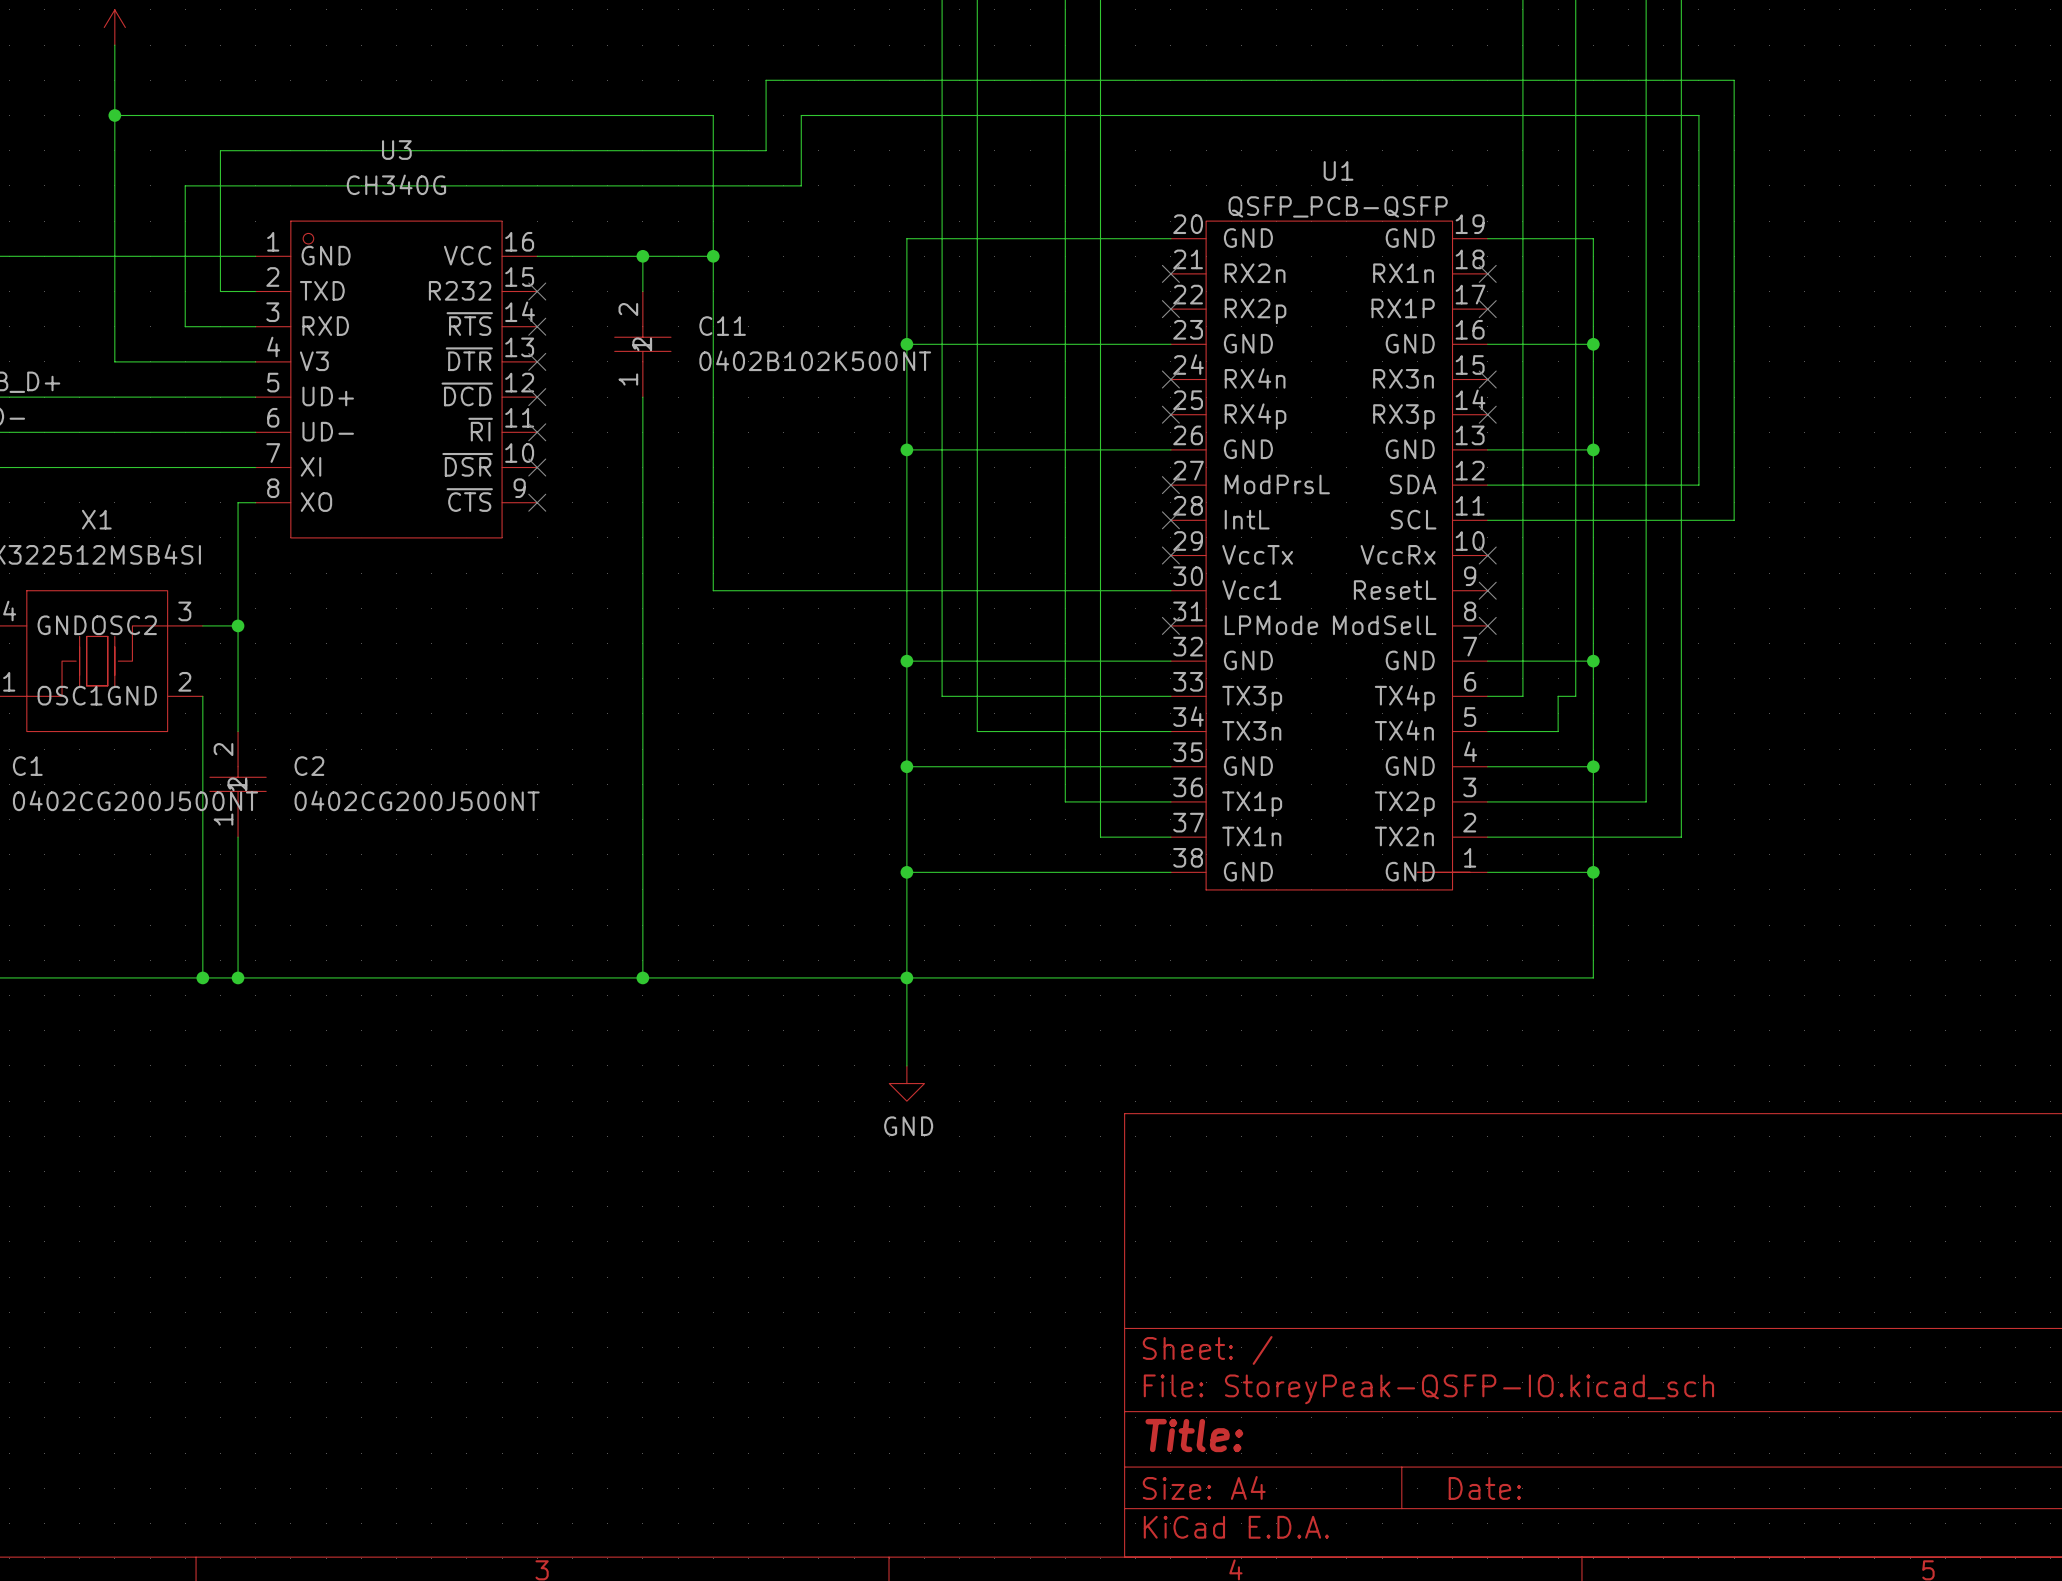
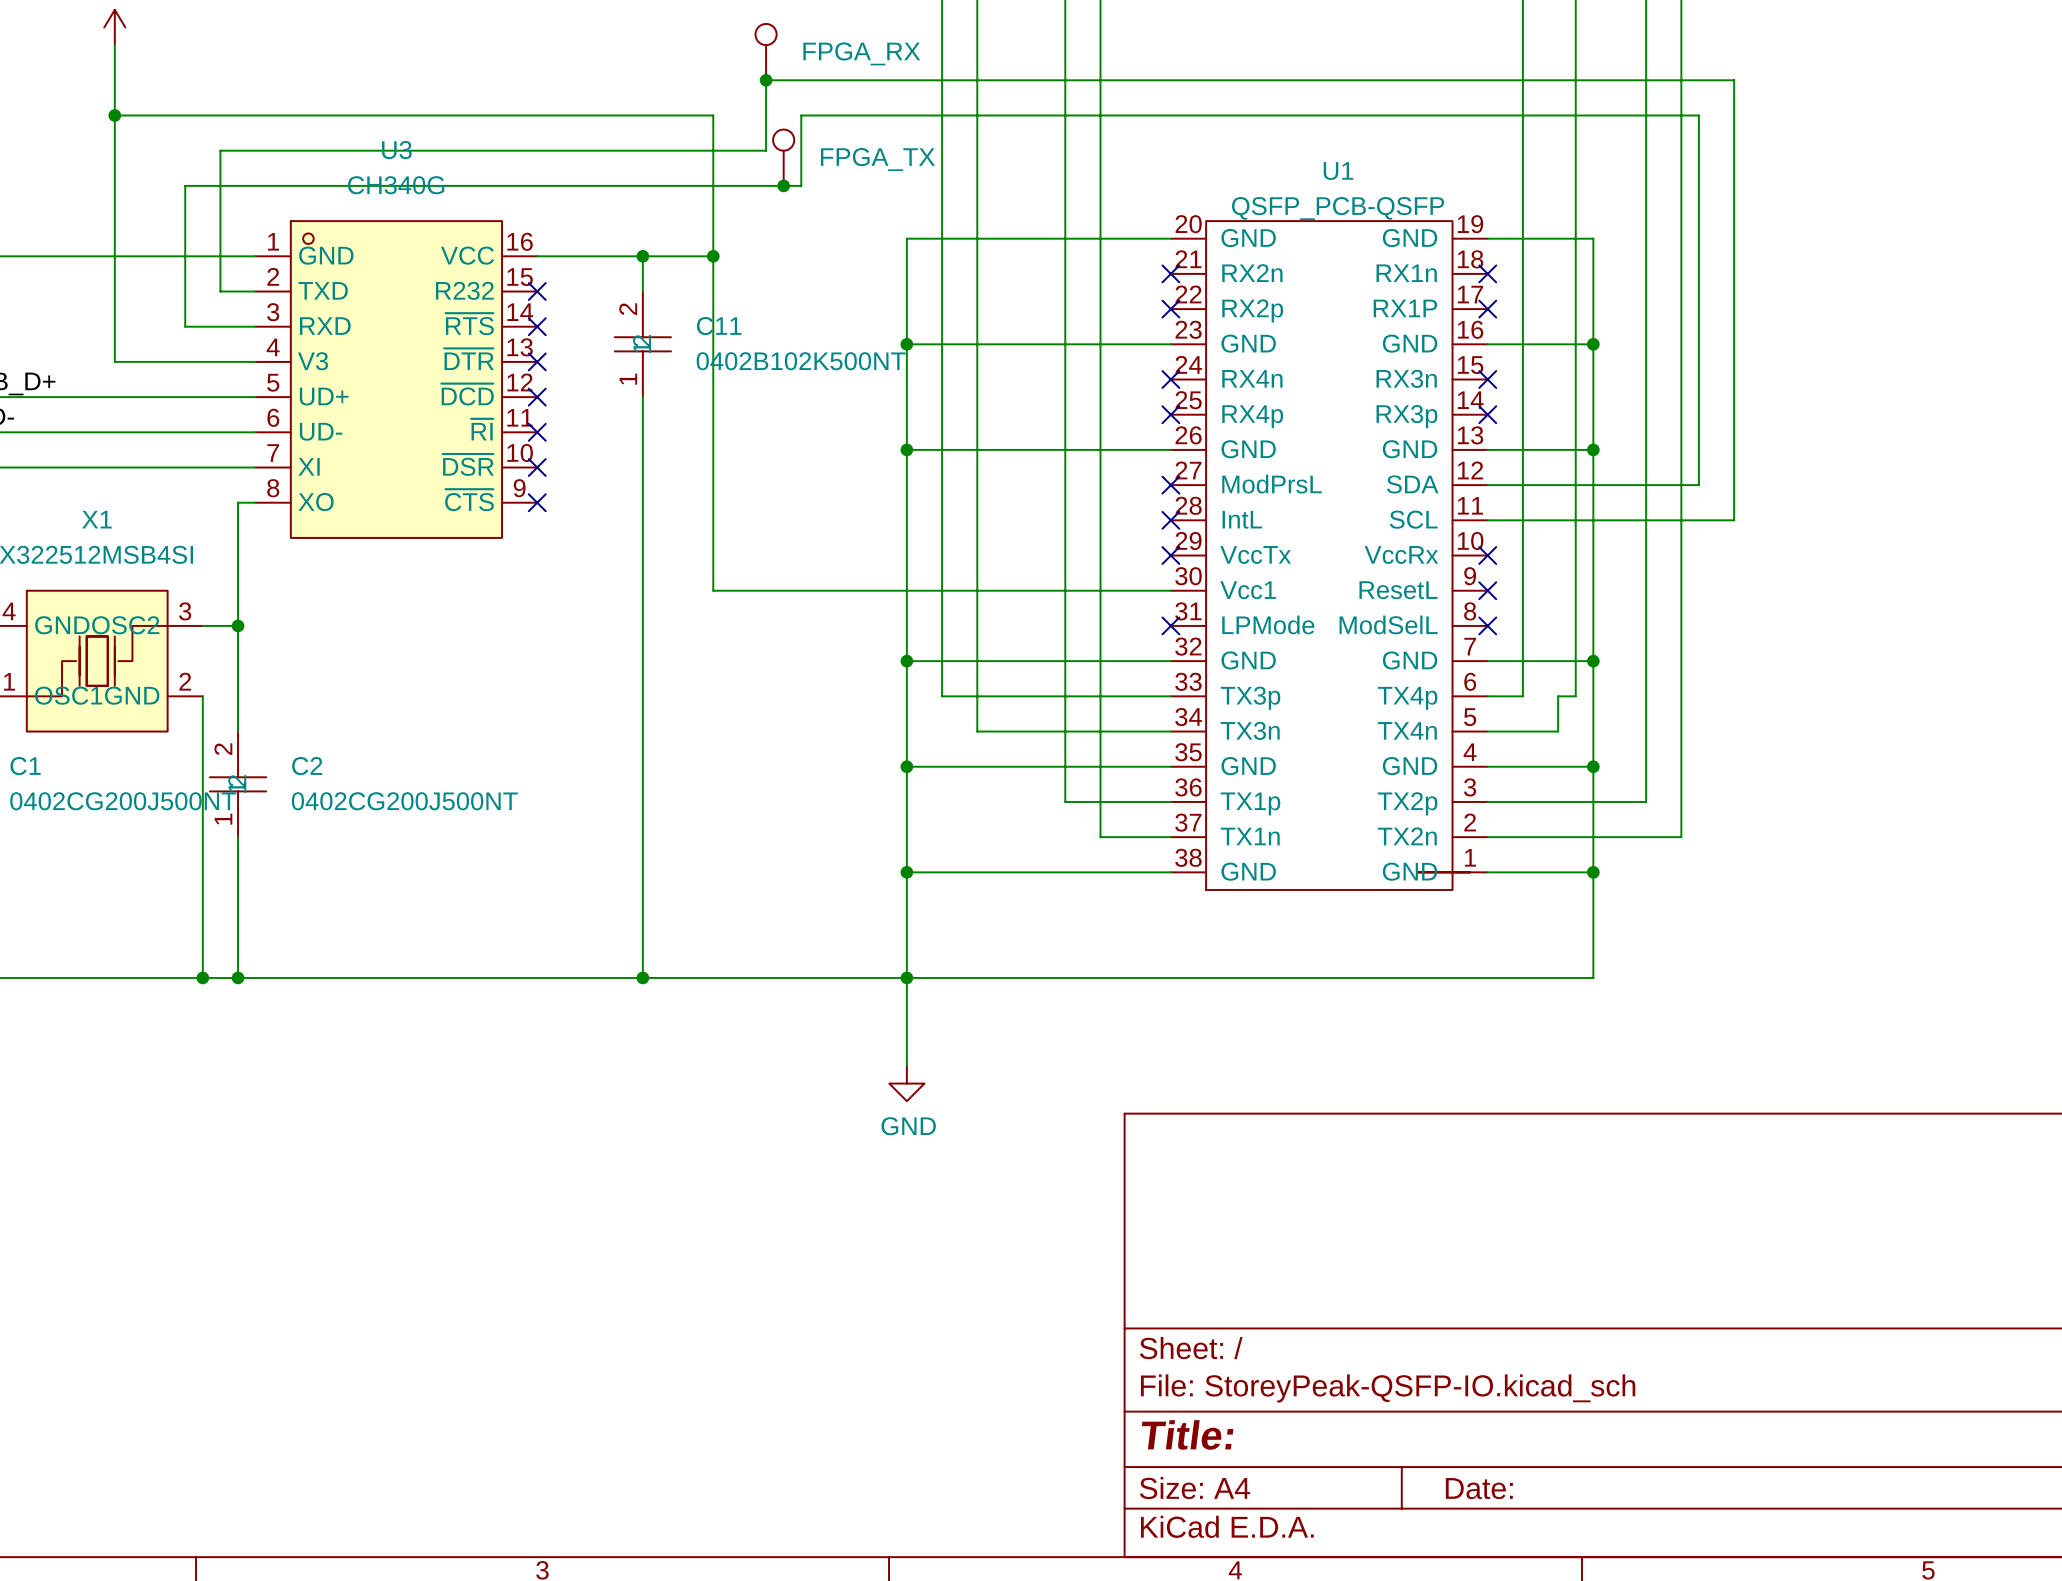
part: none -> FPGA_RX (766, 52)
junction: none -> (766, 80)
part: none -> FPGA_TX (783, 157)
junction: none -> (783, 185)

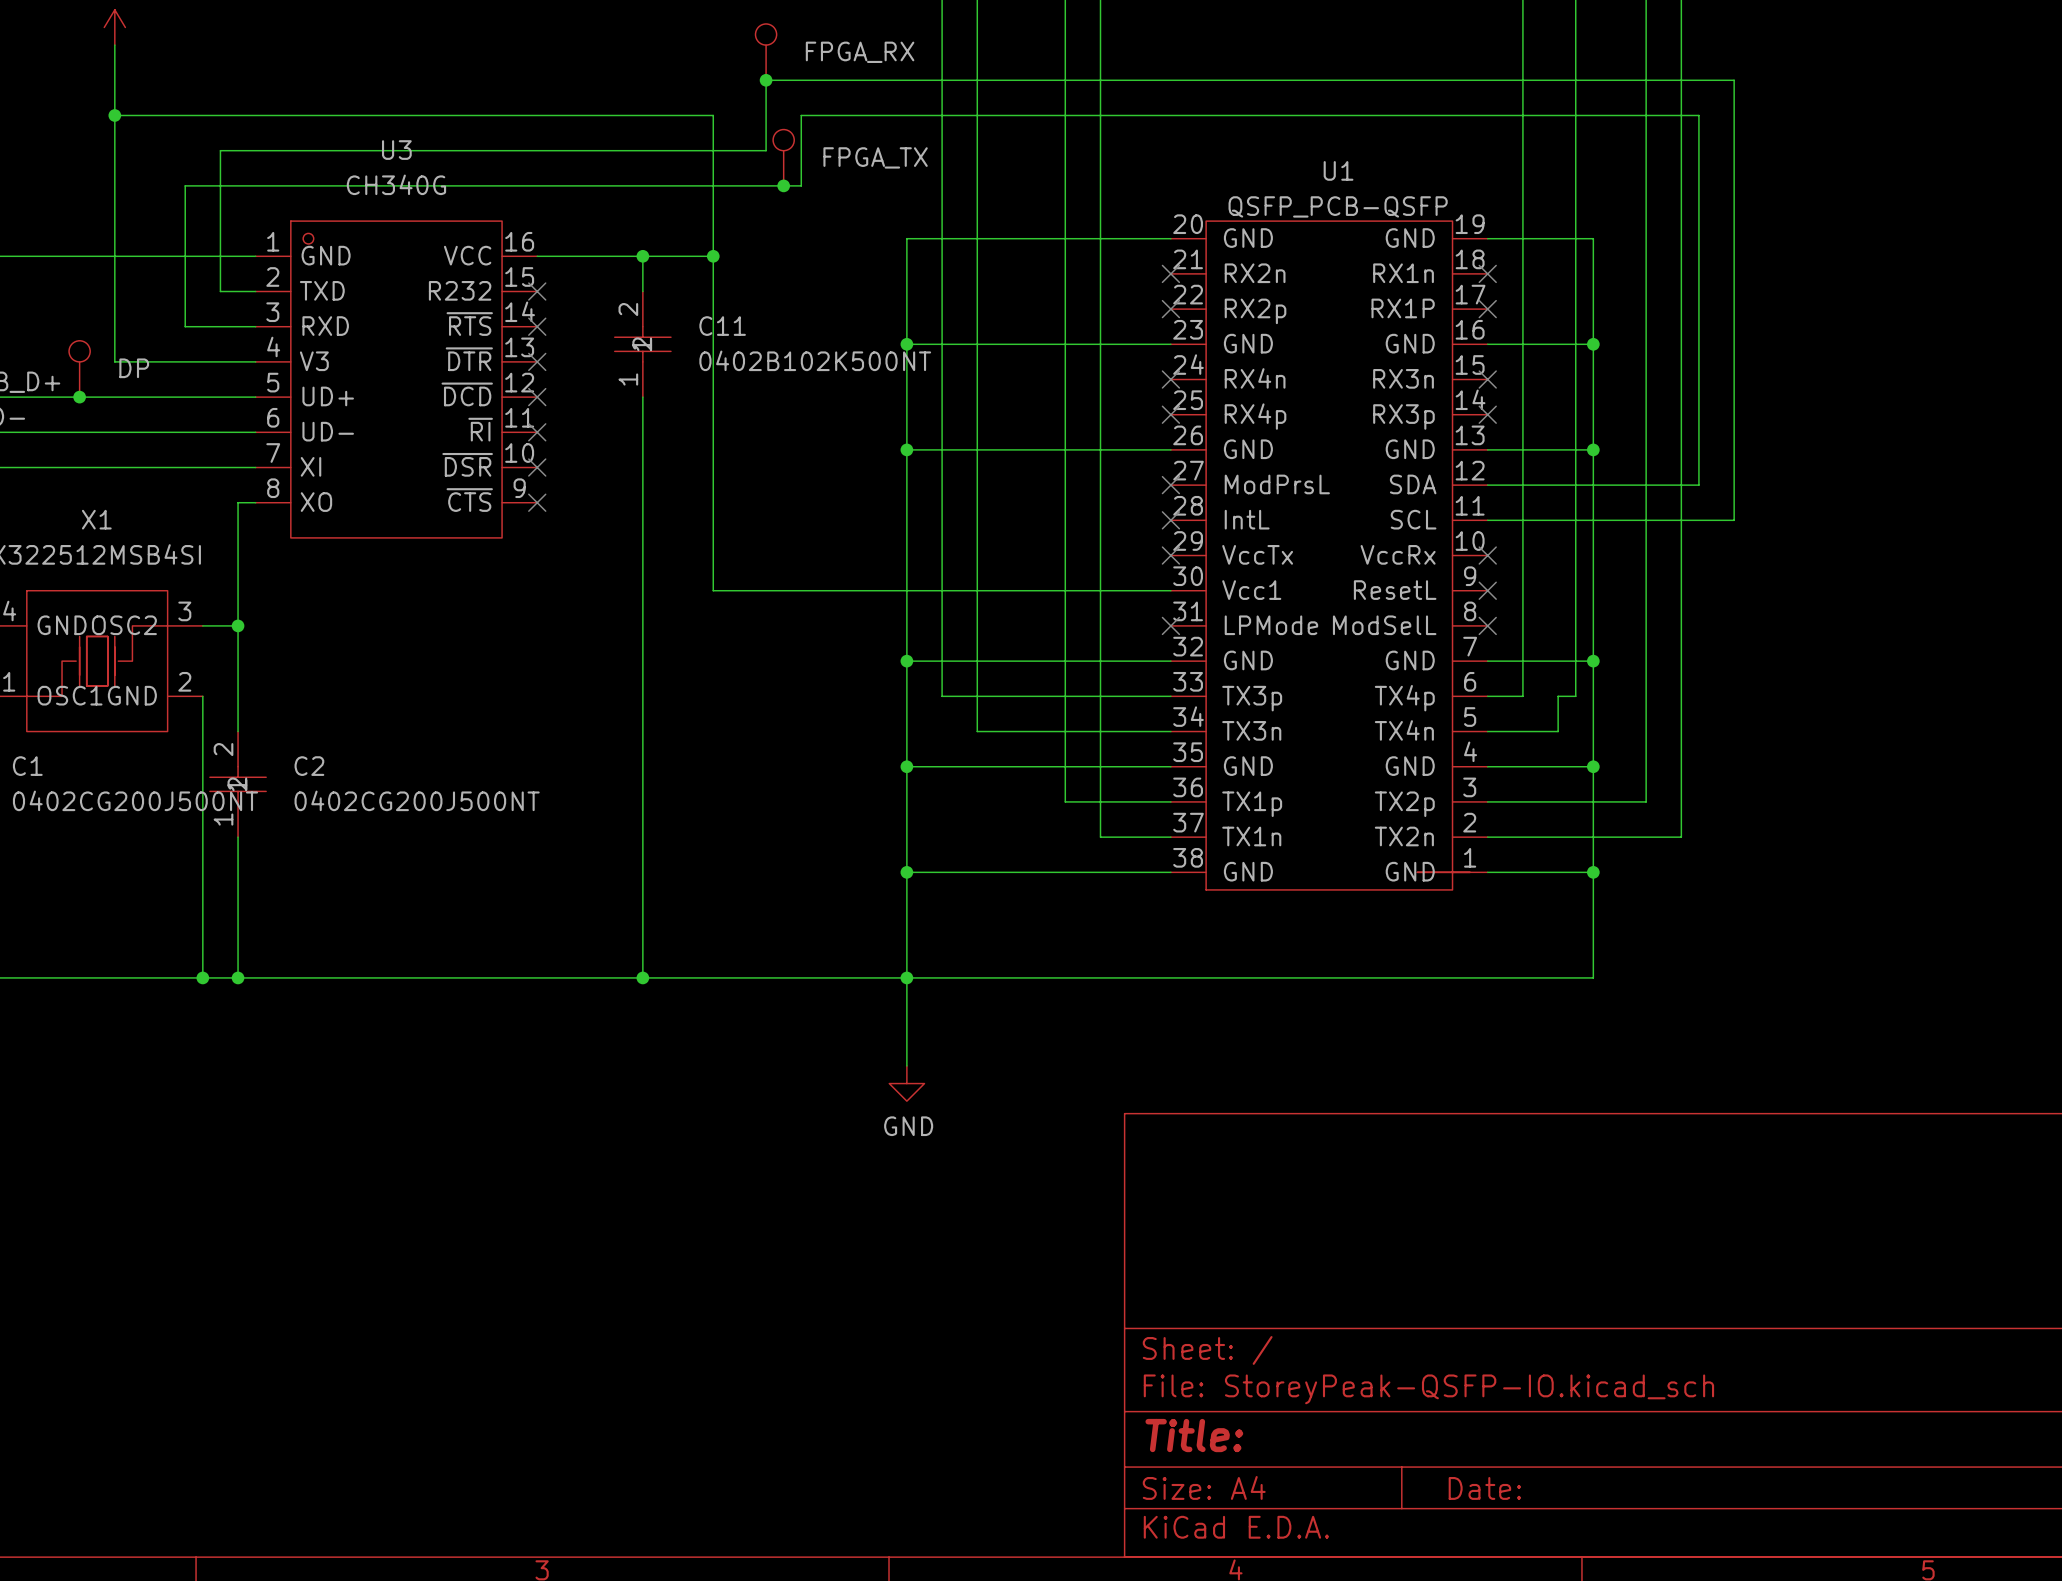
part: none -> DP (79, 368)
junction: none -> (79, 397)

